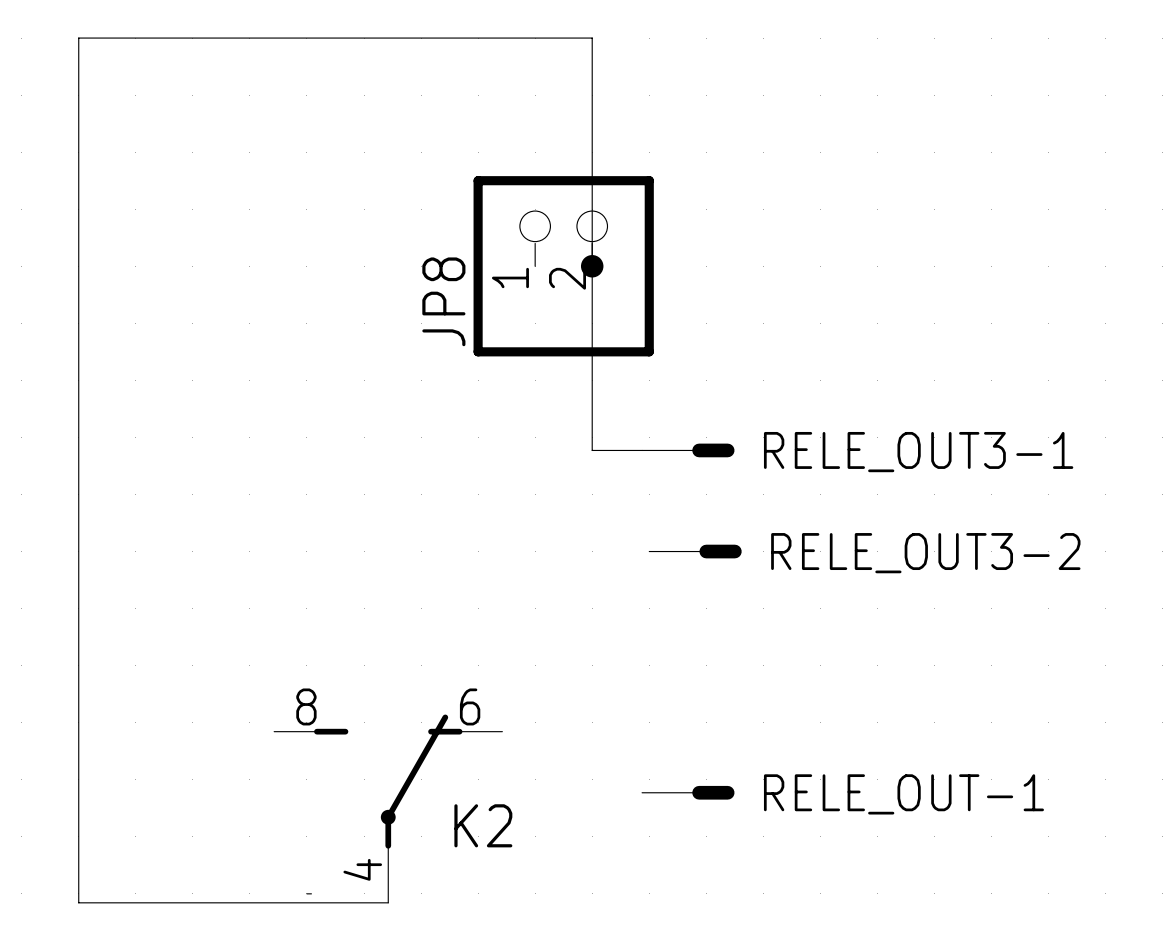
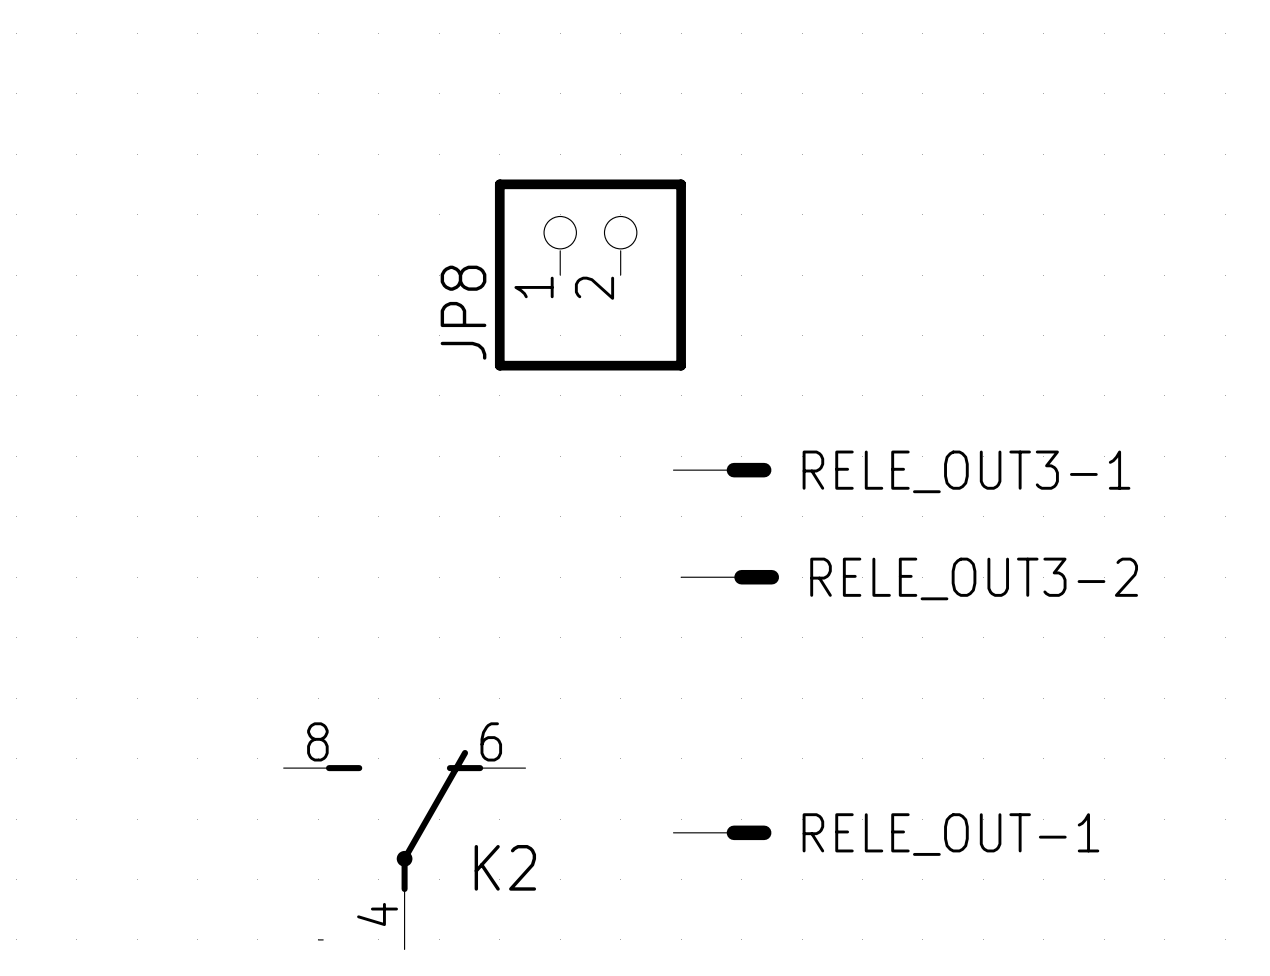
junction: (592, 266) -> none
wire: (642, 450) (592, 450) (592, 38) (78, 38) (78, 902) (388, 902) -> none

